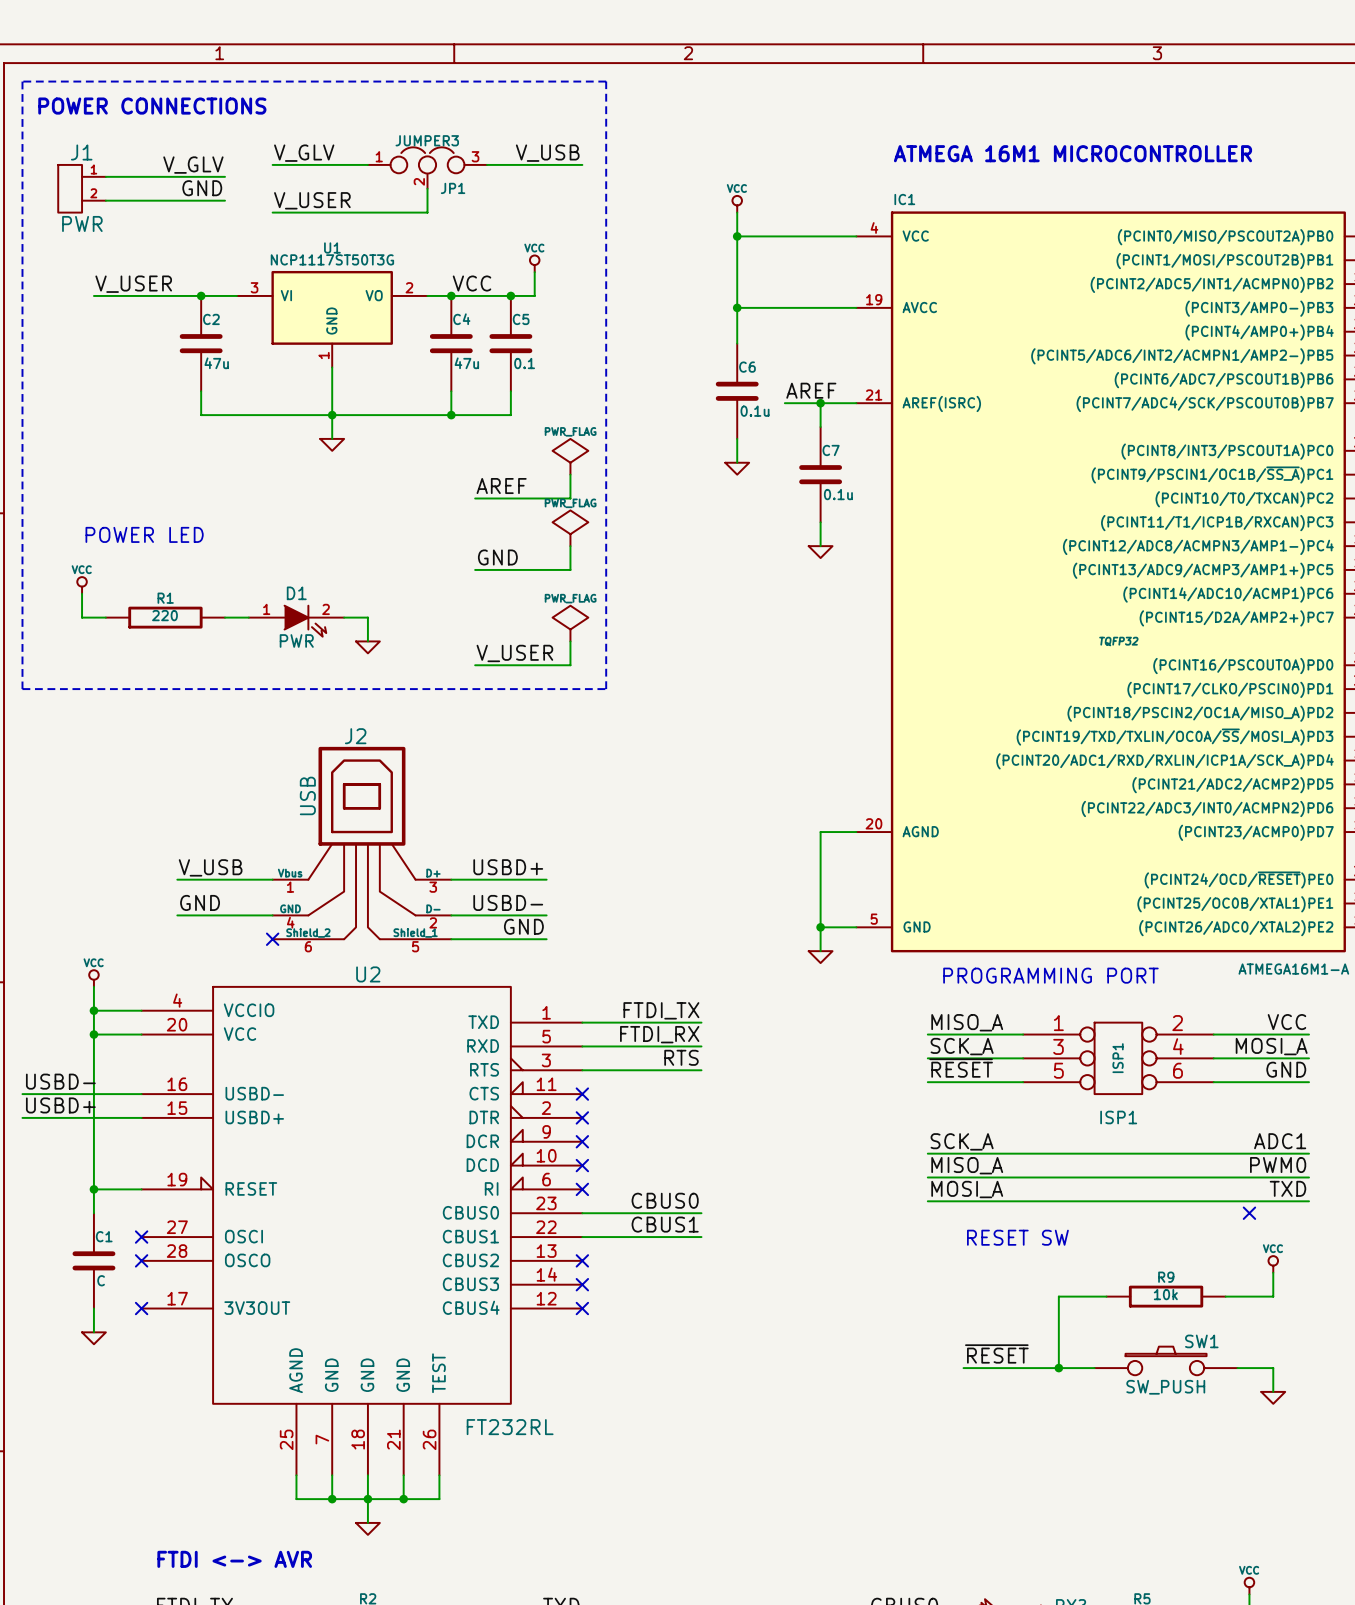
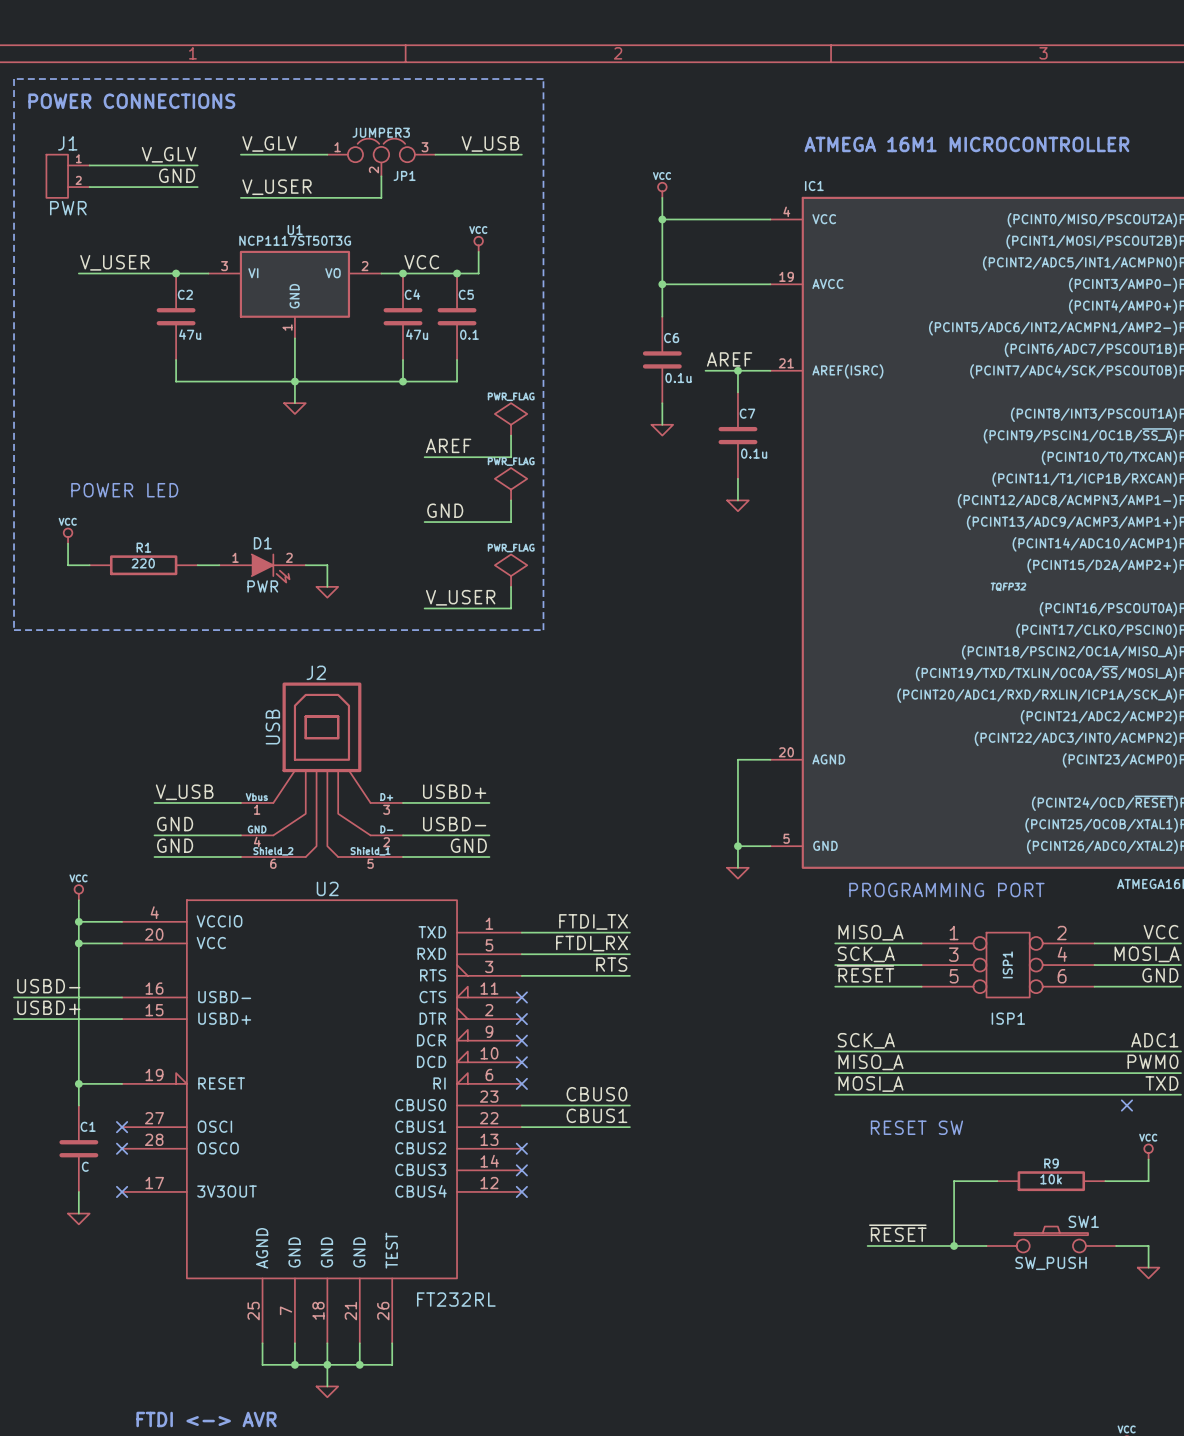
label: none -> GND (175, 845)
wire: none -> (154, 857) (240, 857)
no-connect mark: (272, 939) -> none

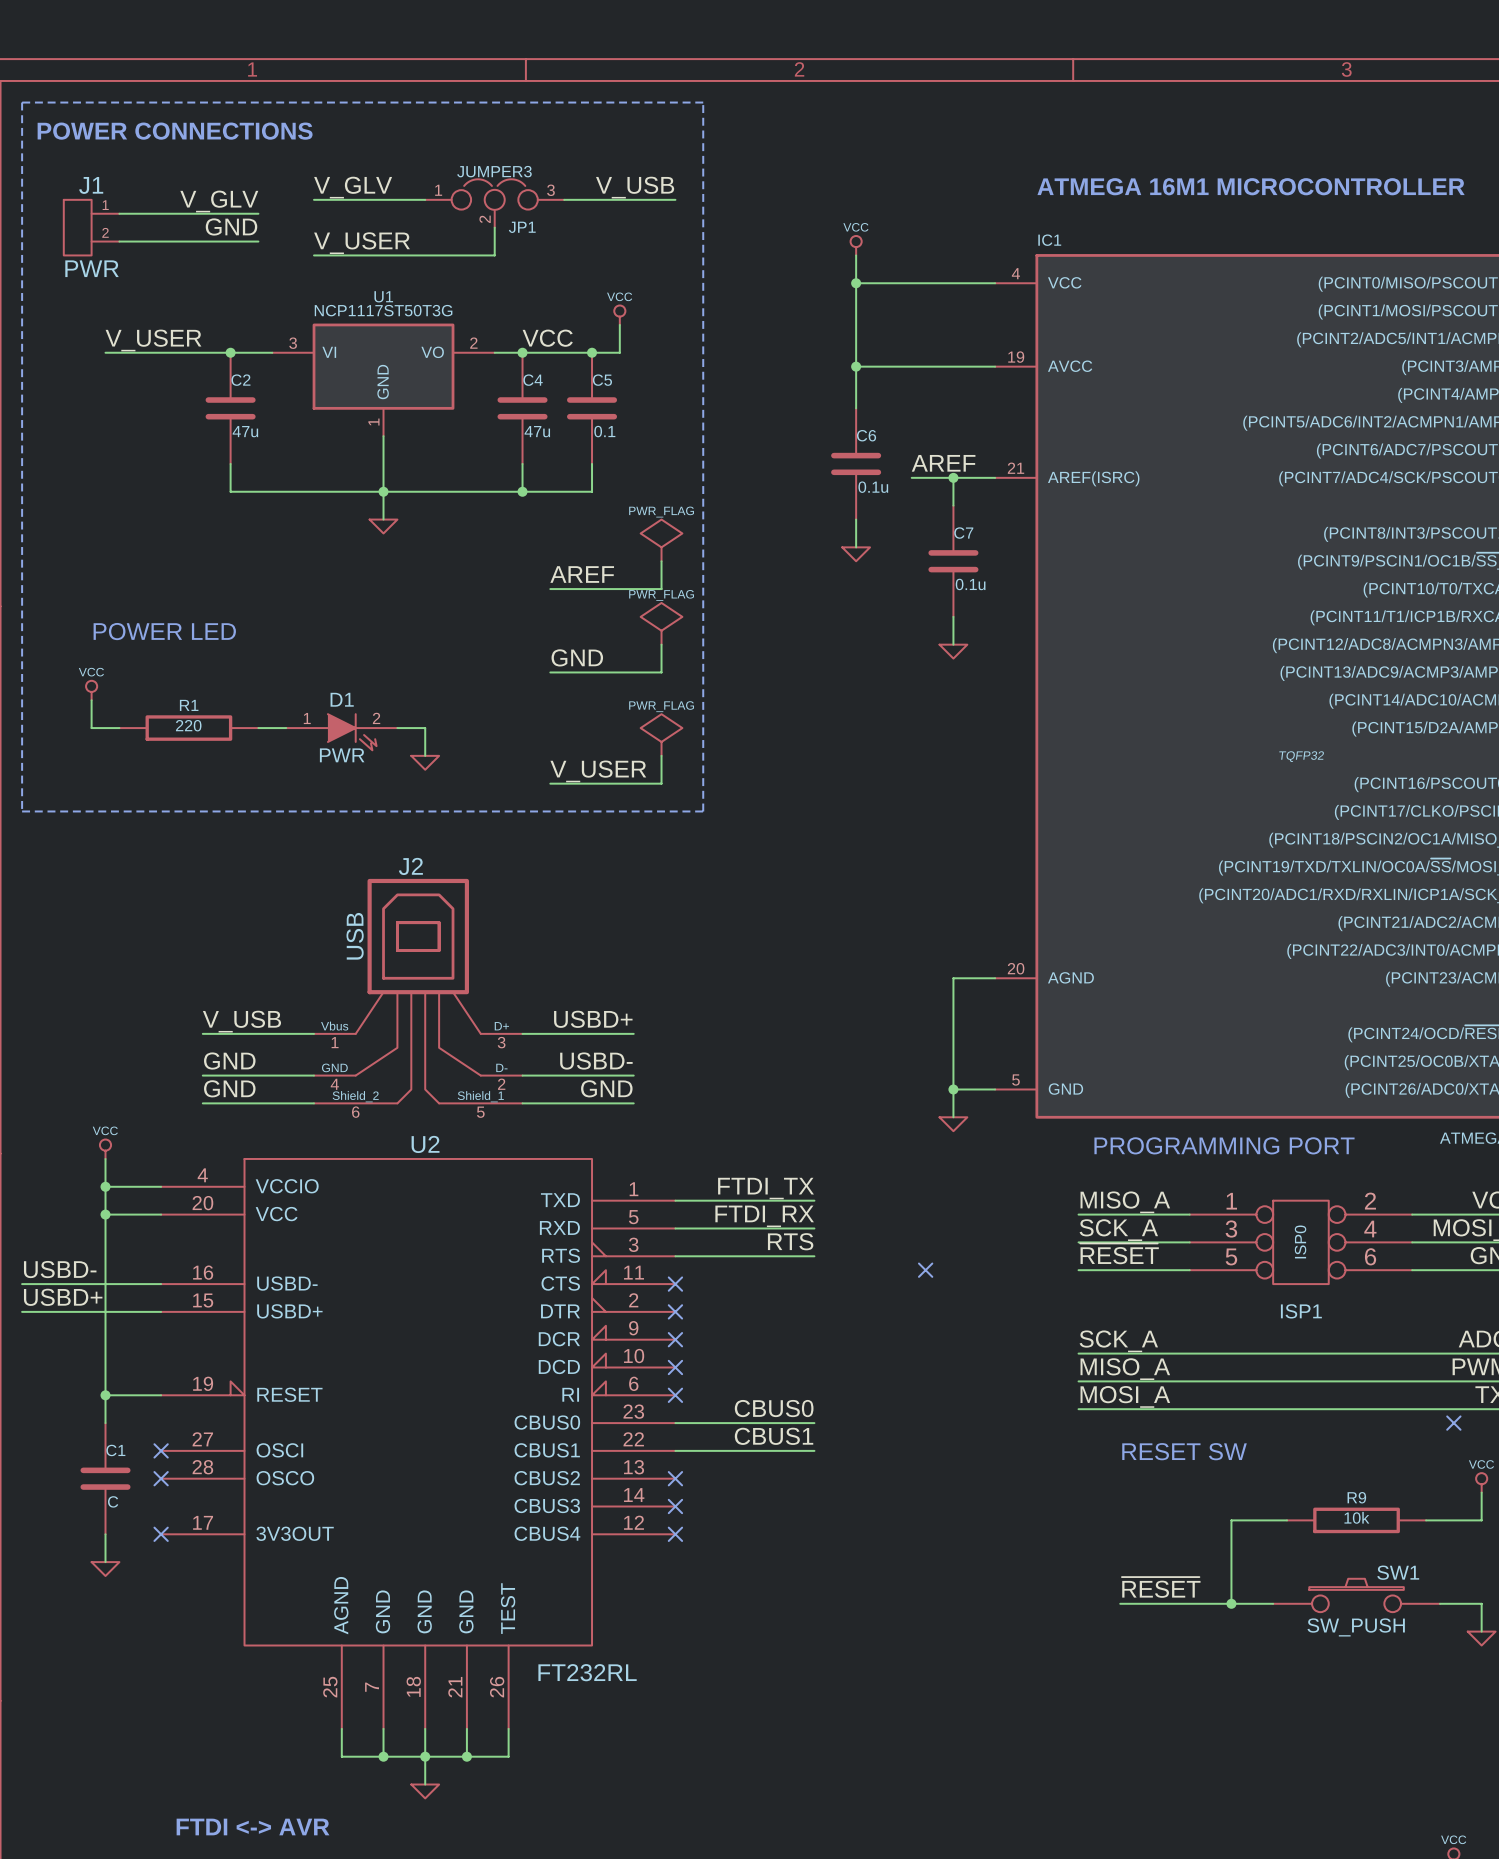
ISP1 value: ISP1 (1007, 964) -> ISP0 (1300, 1241)
no-connect mark: none -> (925, 1270)

